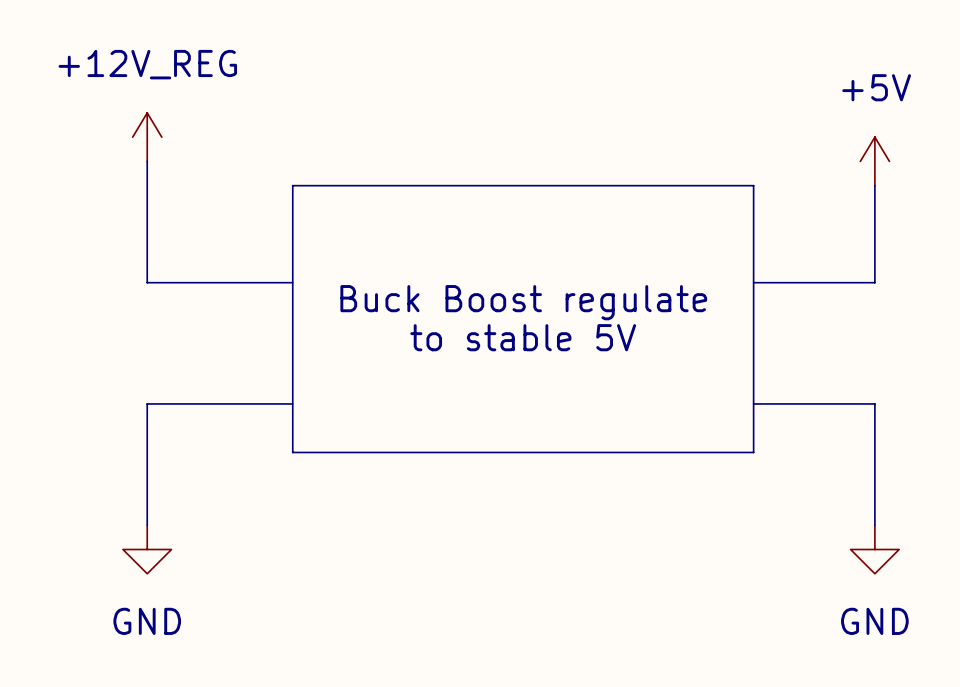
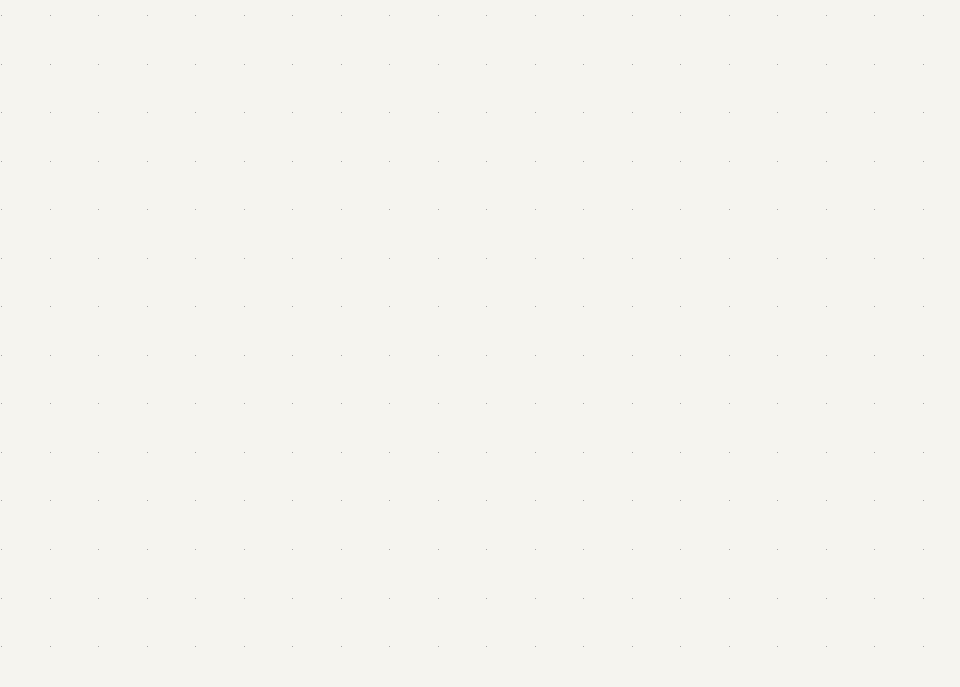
power symbol: +12V_REG (147, 137) -> none
wire: (147, 161) (147, 282) (292, 282) -> none
power symbol: +5V (874, 161) -> none
line: (292, 185) (753, 185) (753, 452) (292, 452) (292, 185) -> none
wire: (874, 185) (874, 282) (753, 282) -> none
text: Buck Boost regulate (523, 302) -> none
text: to stable 5V (523, 337) -> none
wire: (292, 403) (147, 403) (147, 525) -> none
wire: (753, 403) (874, 403) (874, 525) -> none
power symbol: GND (147, 549) -> none
power symbol: GND (874, 549) -> none

